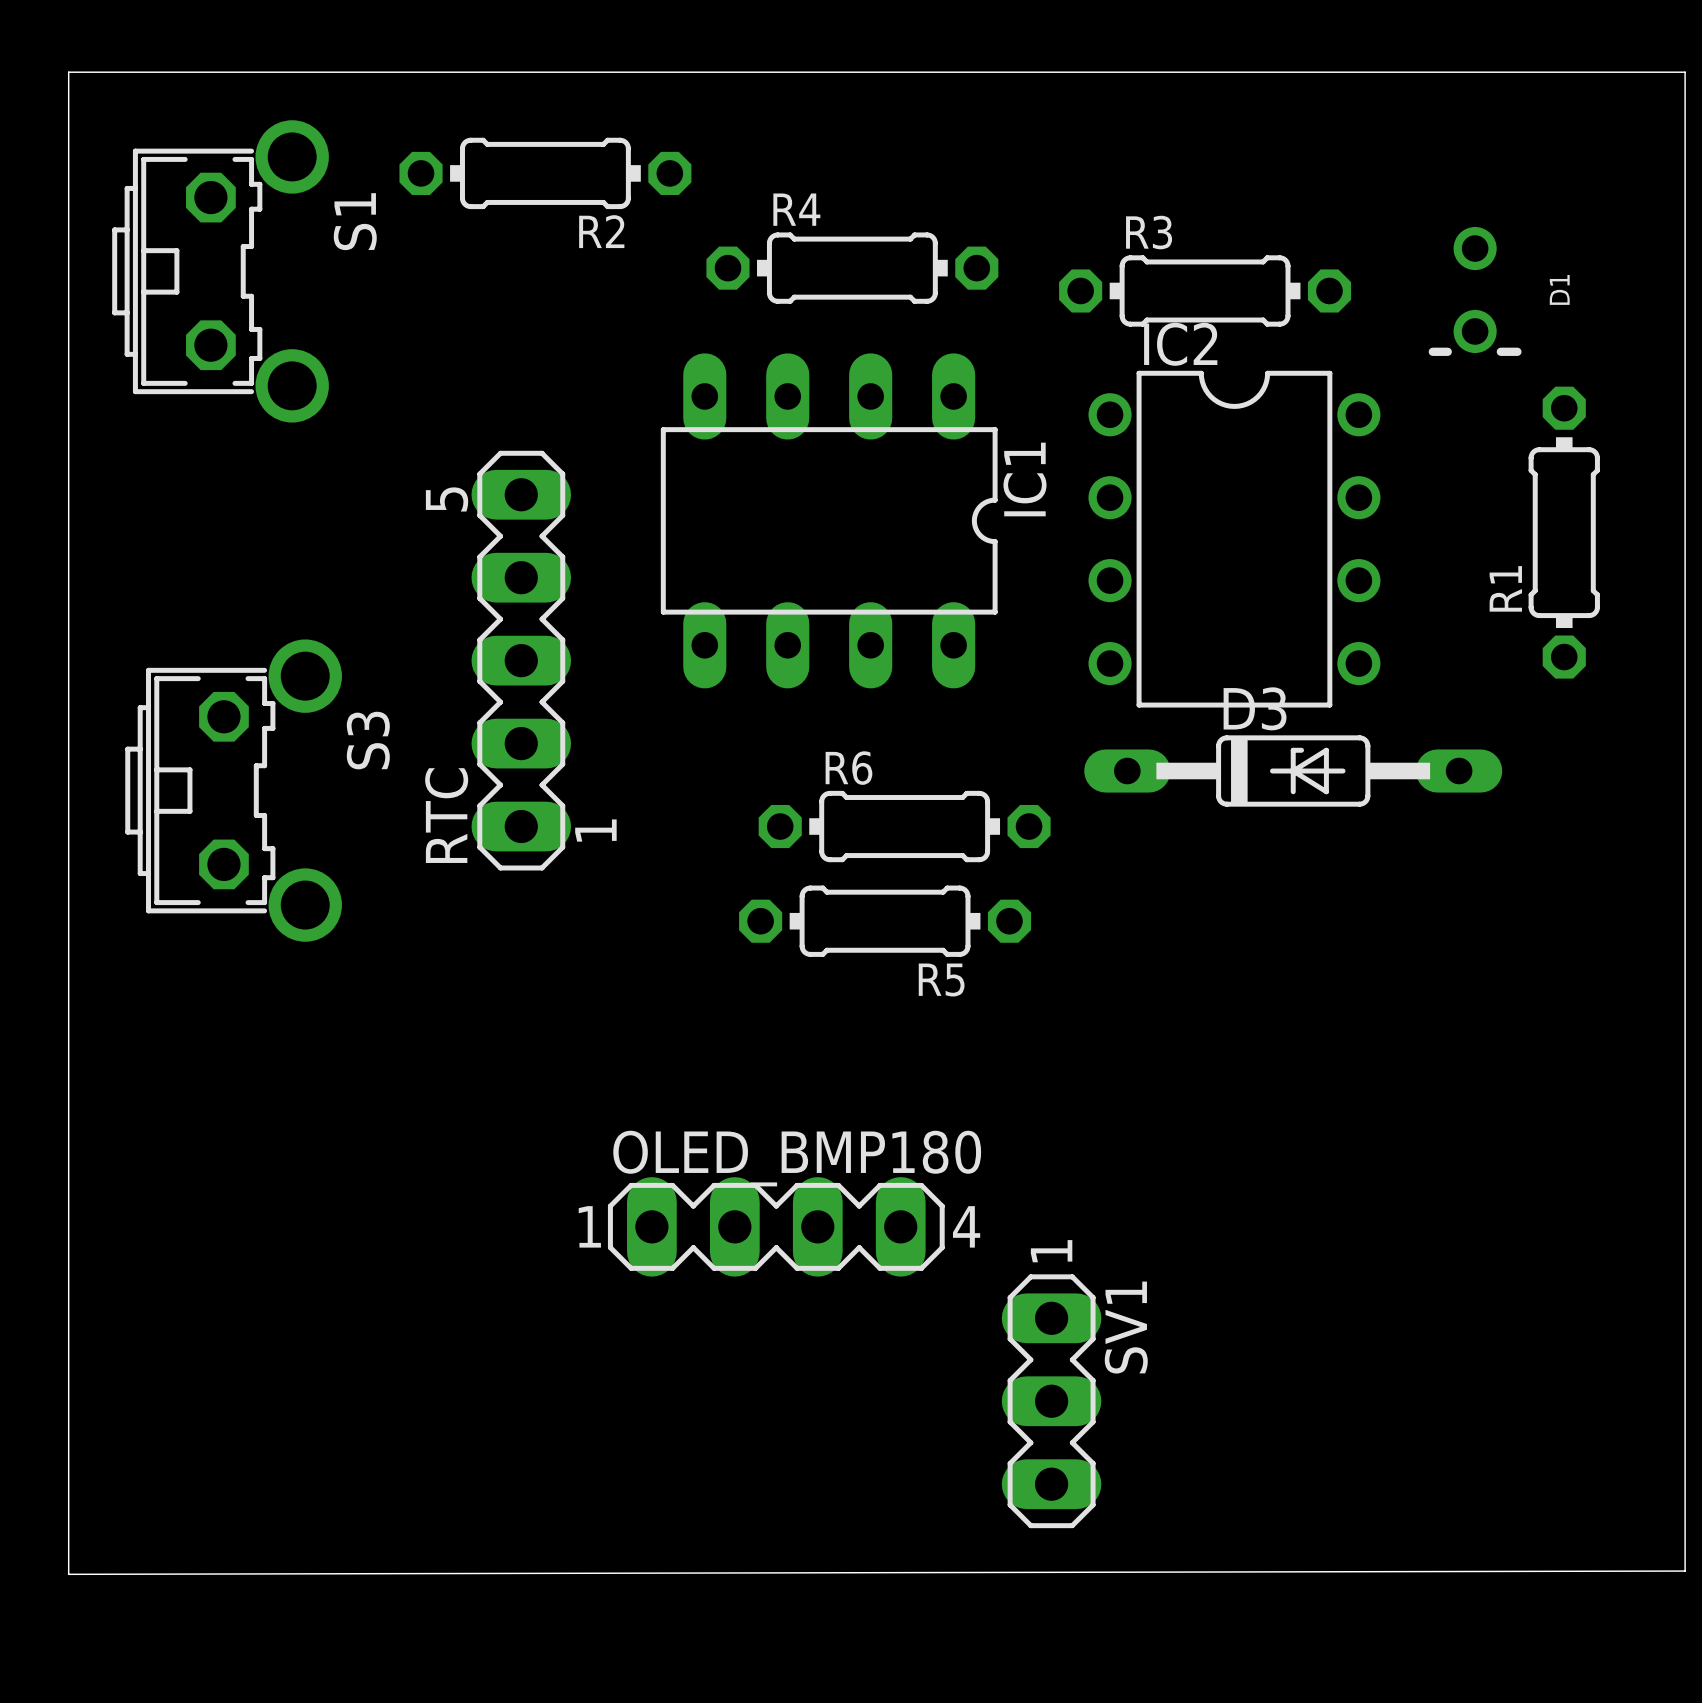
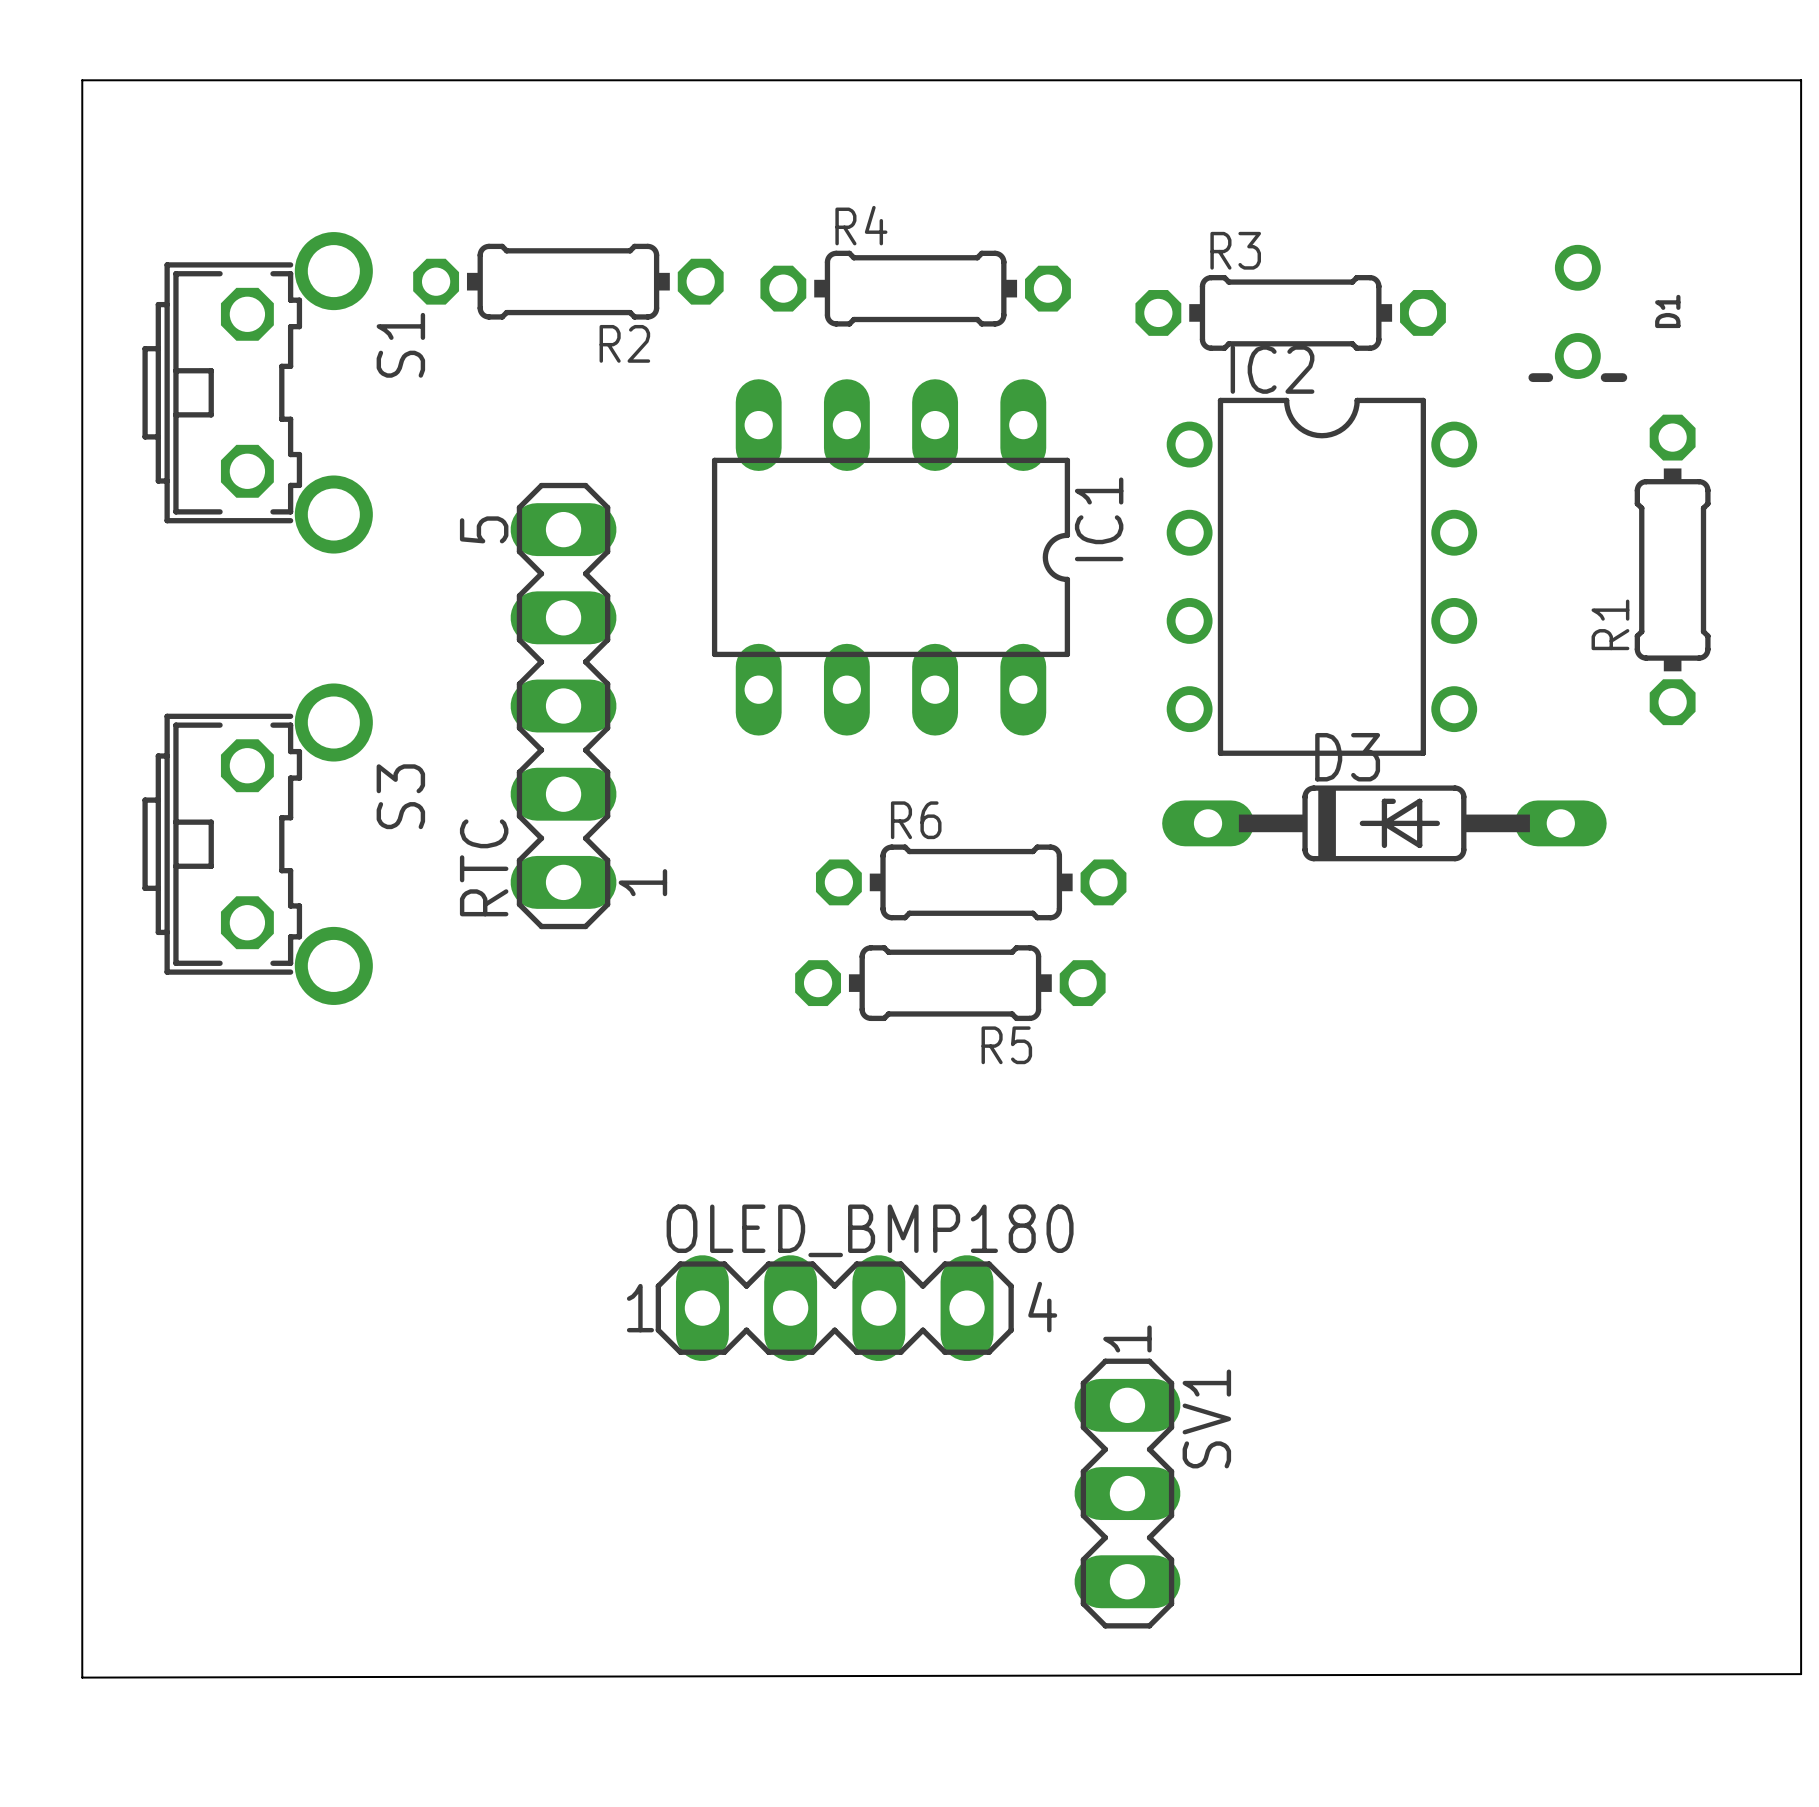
R2 position: (545, 173) -> (568, 281)
S1 position: (220, 271) -> (257, 392)

